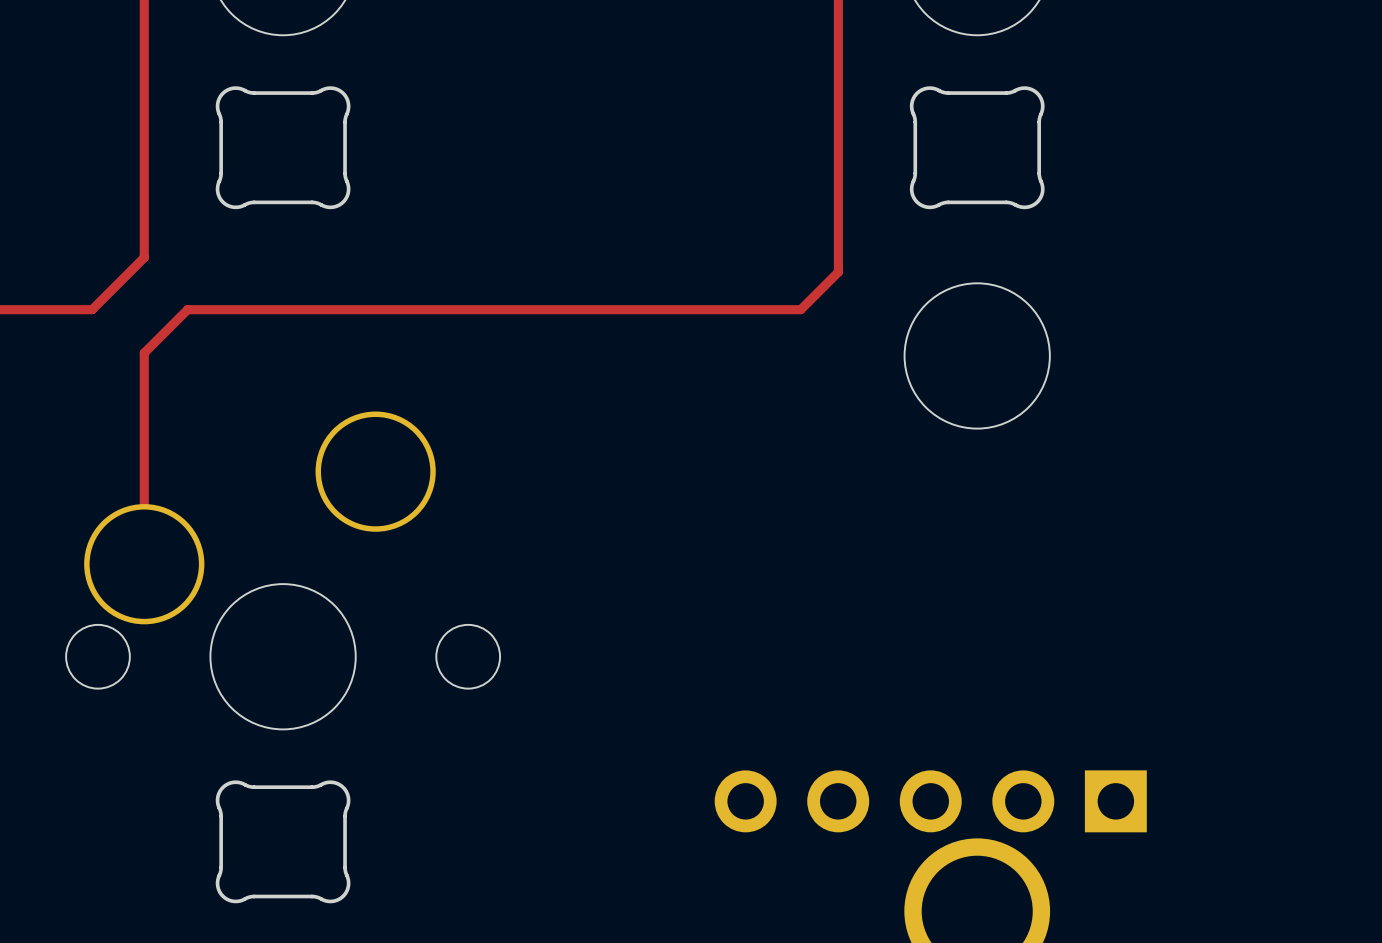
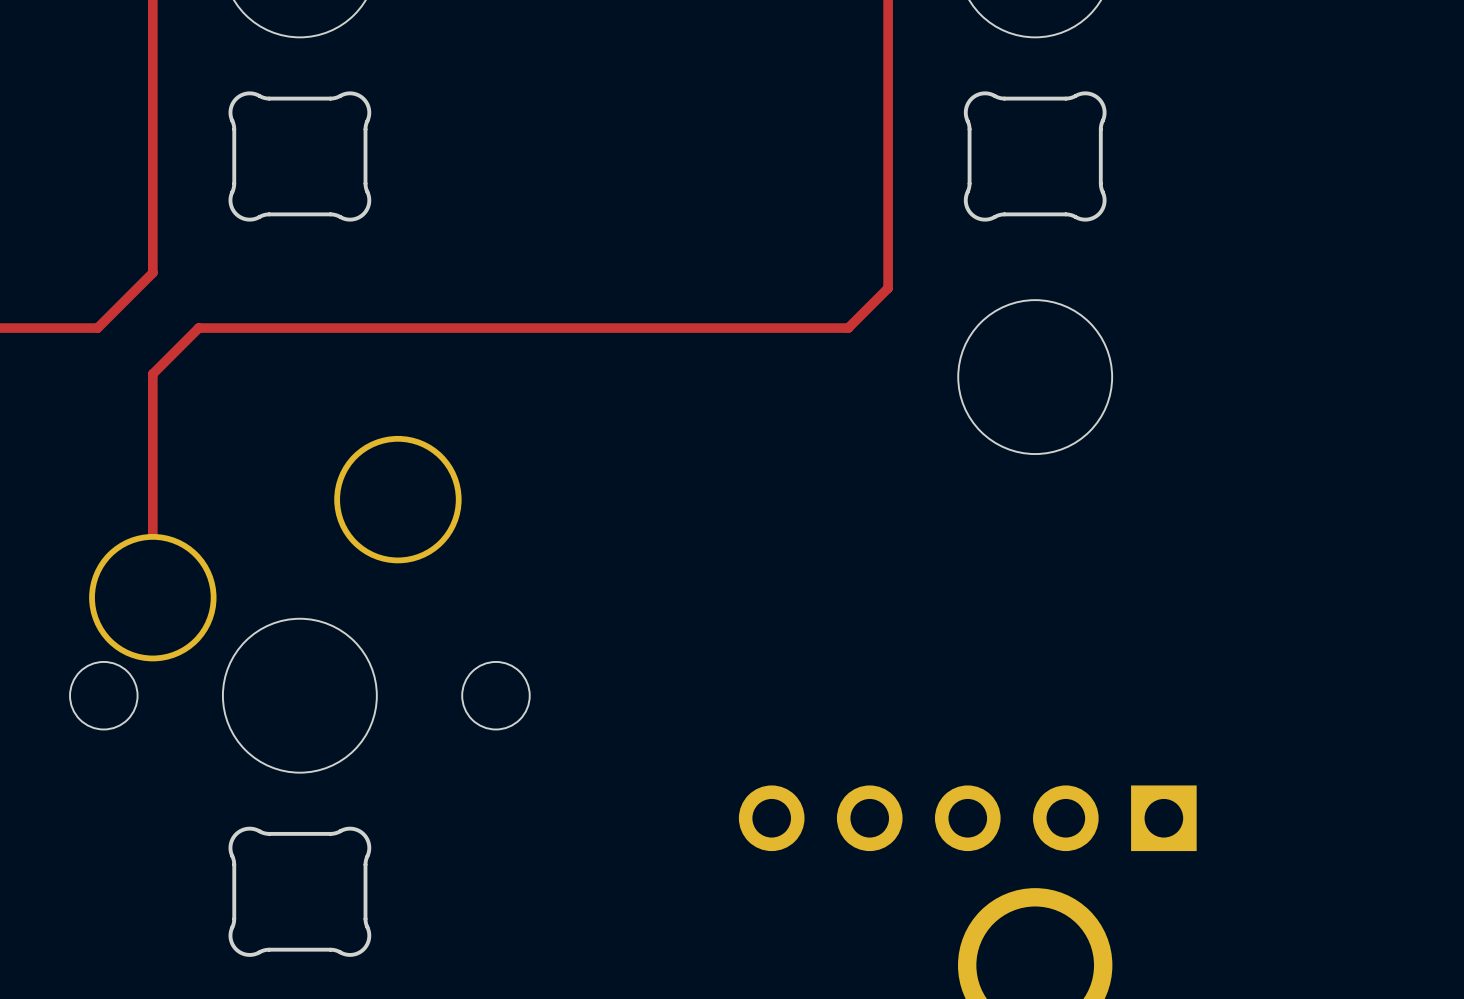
part position: (930, 801) -> (967, 818)

